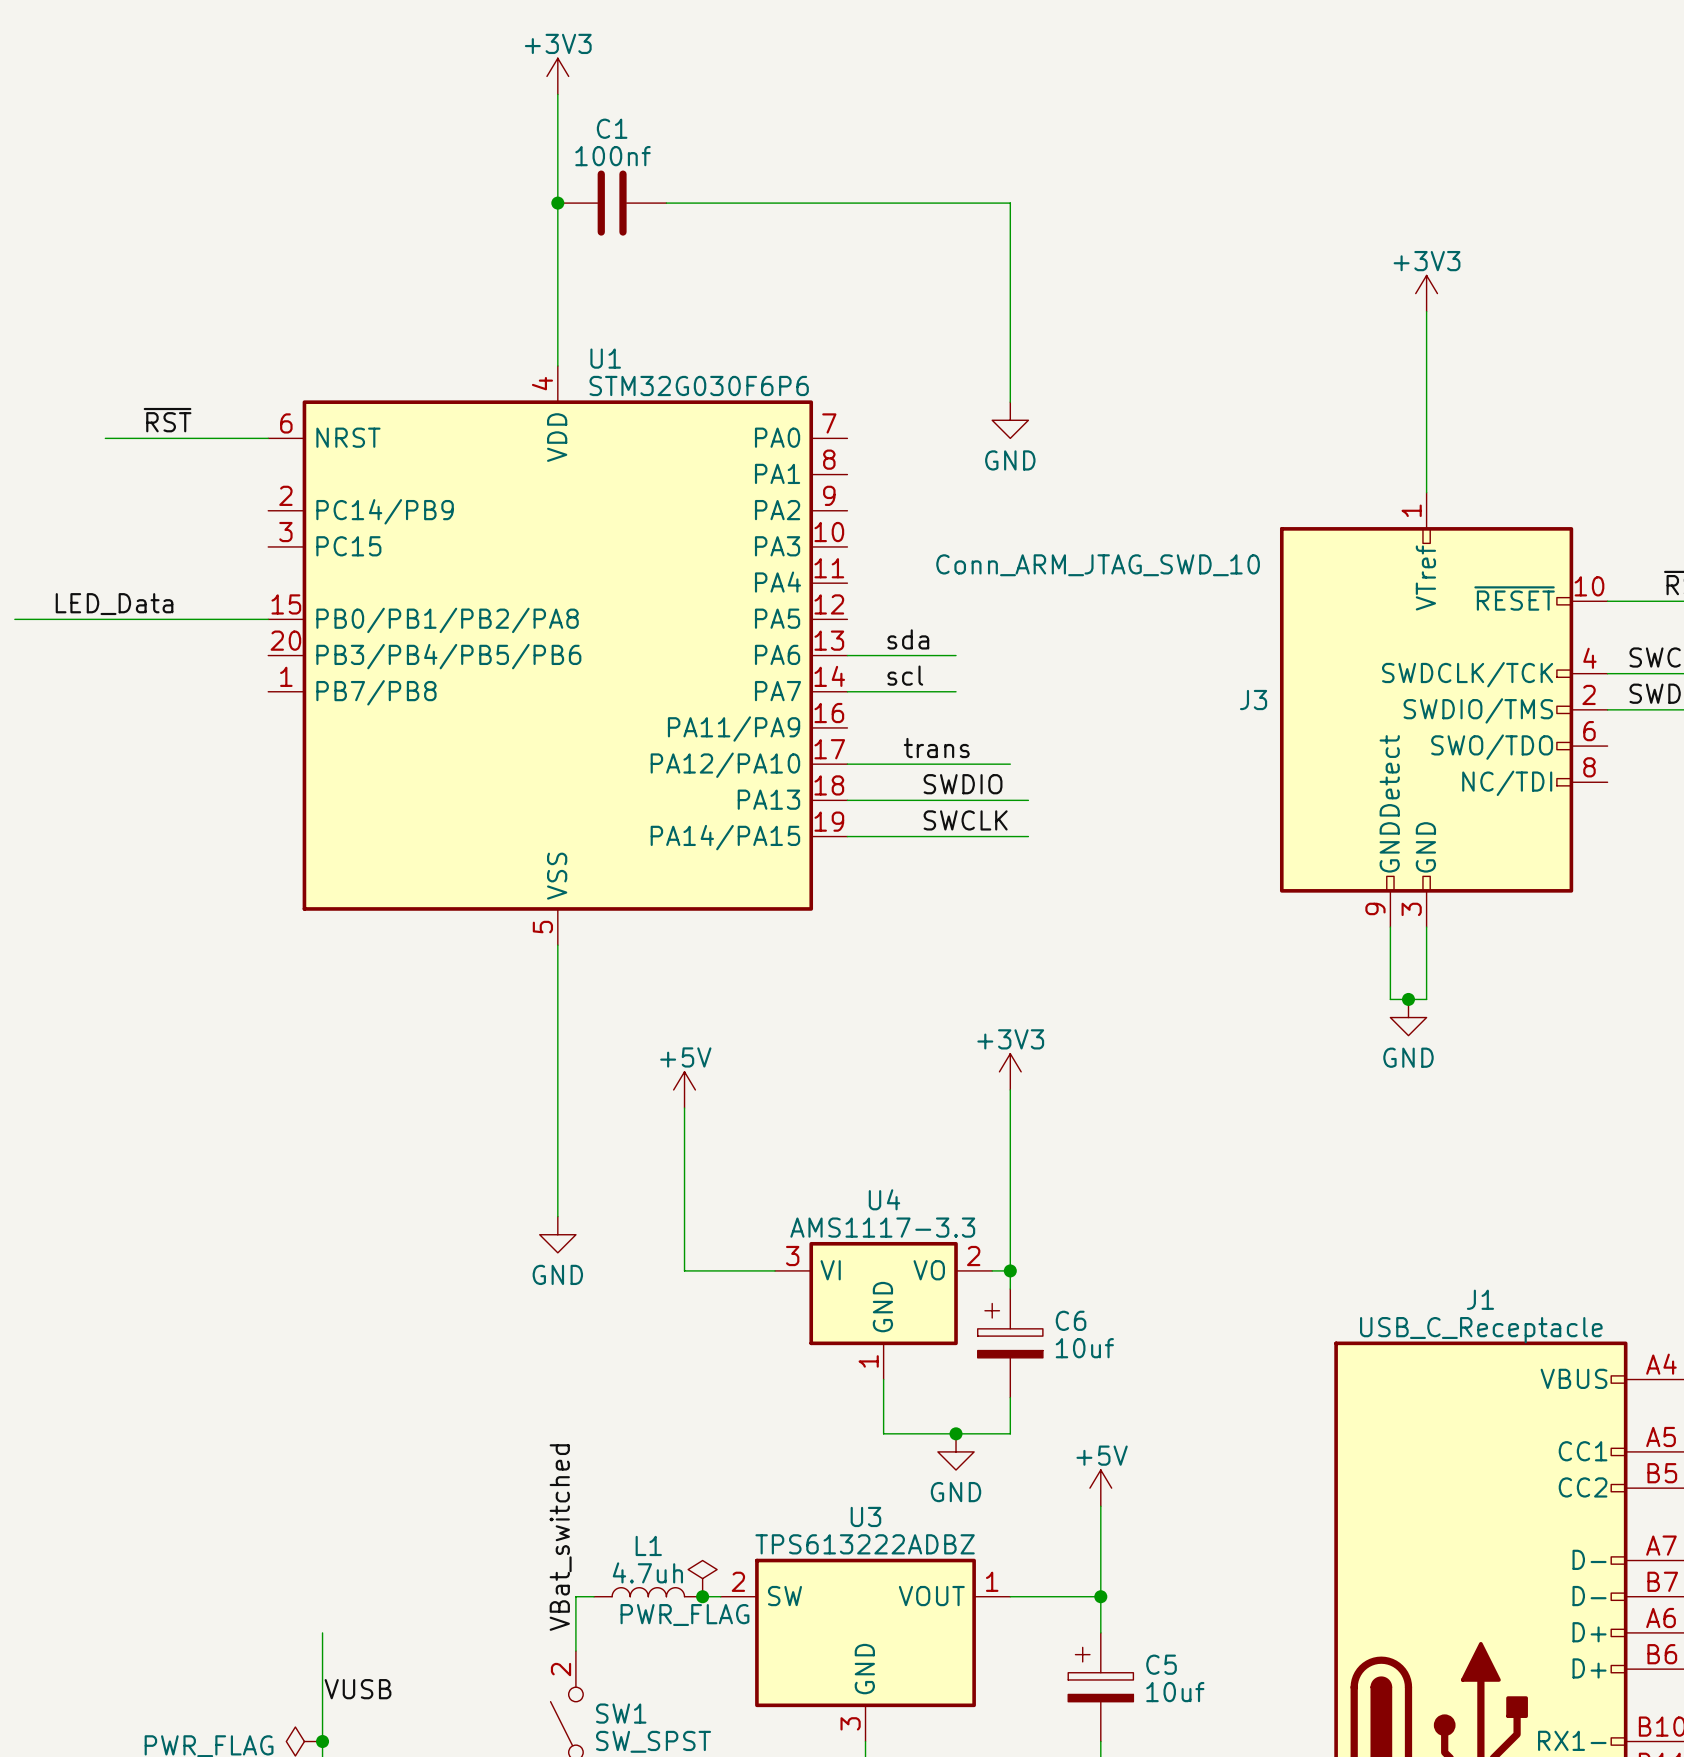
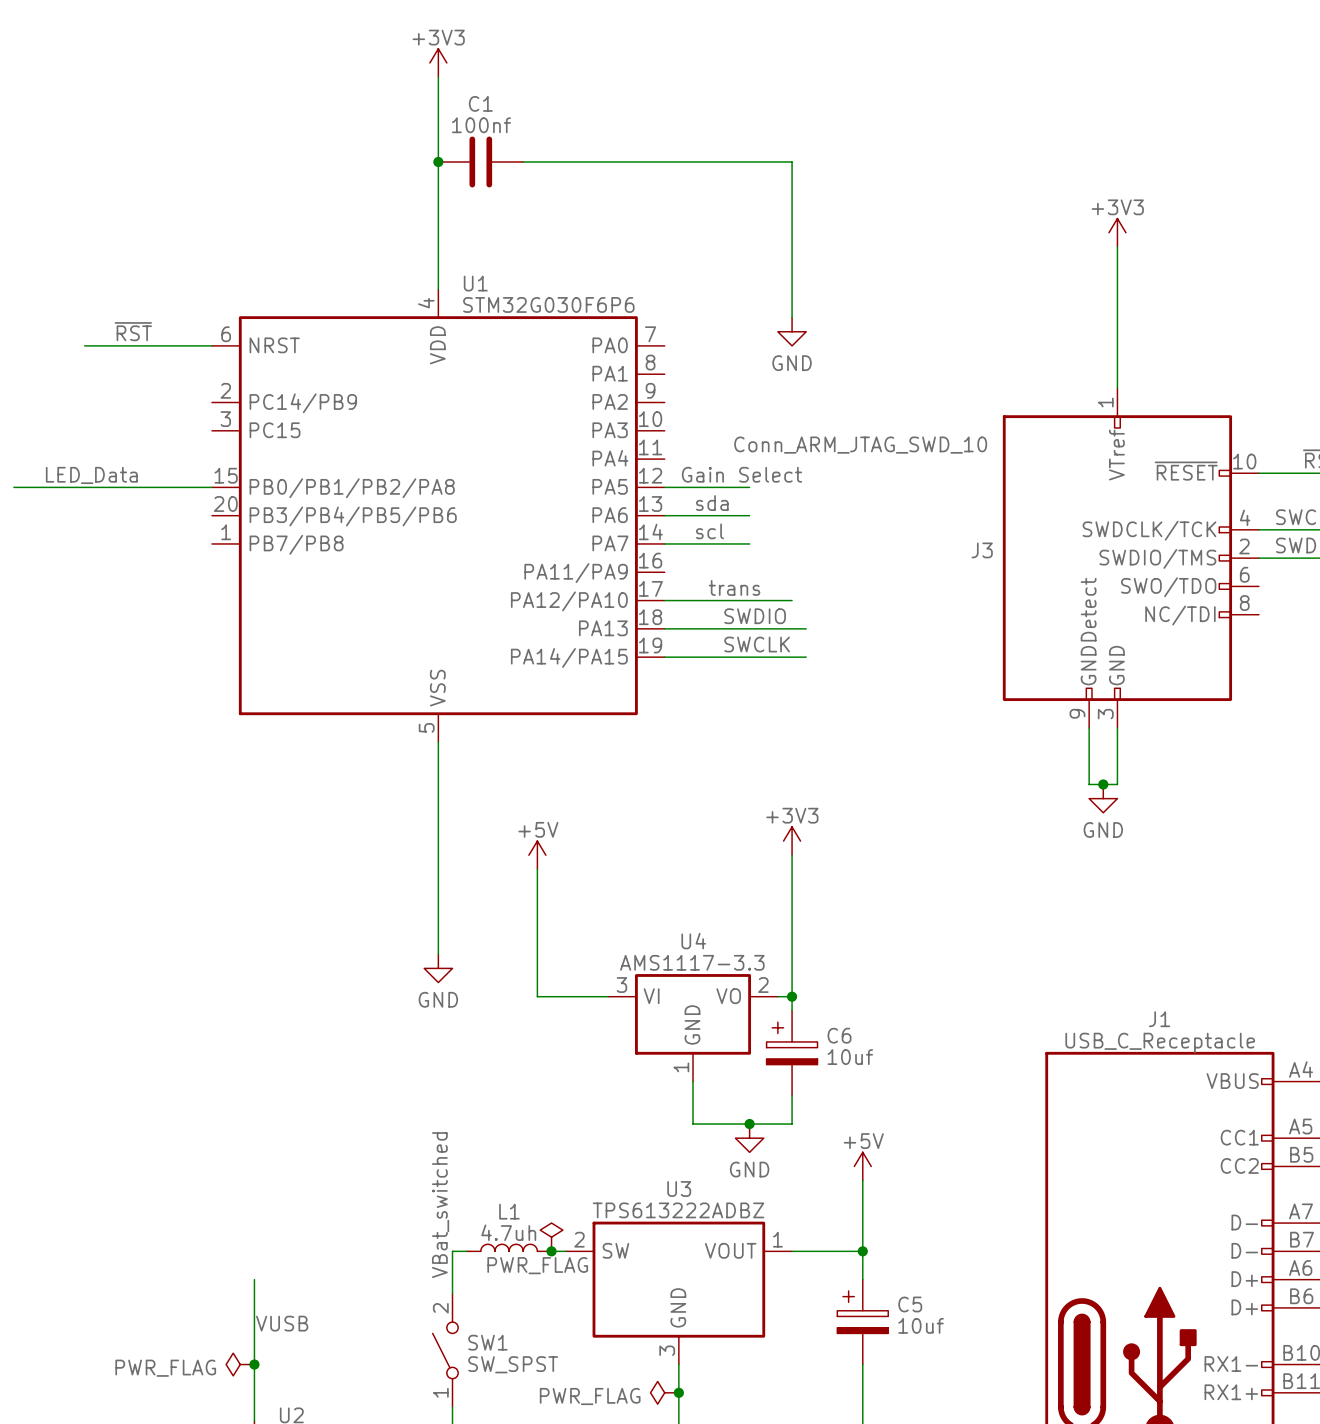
label: none -> Gain Select (741, 474)
wire: none -> (664, 487) (749, 487)

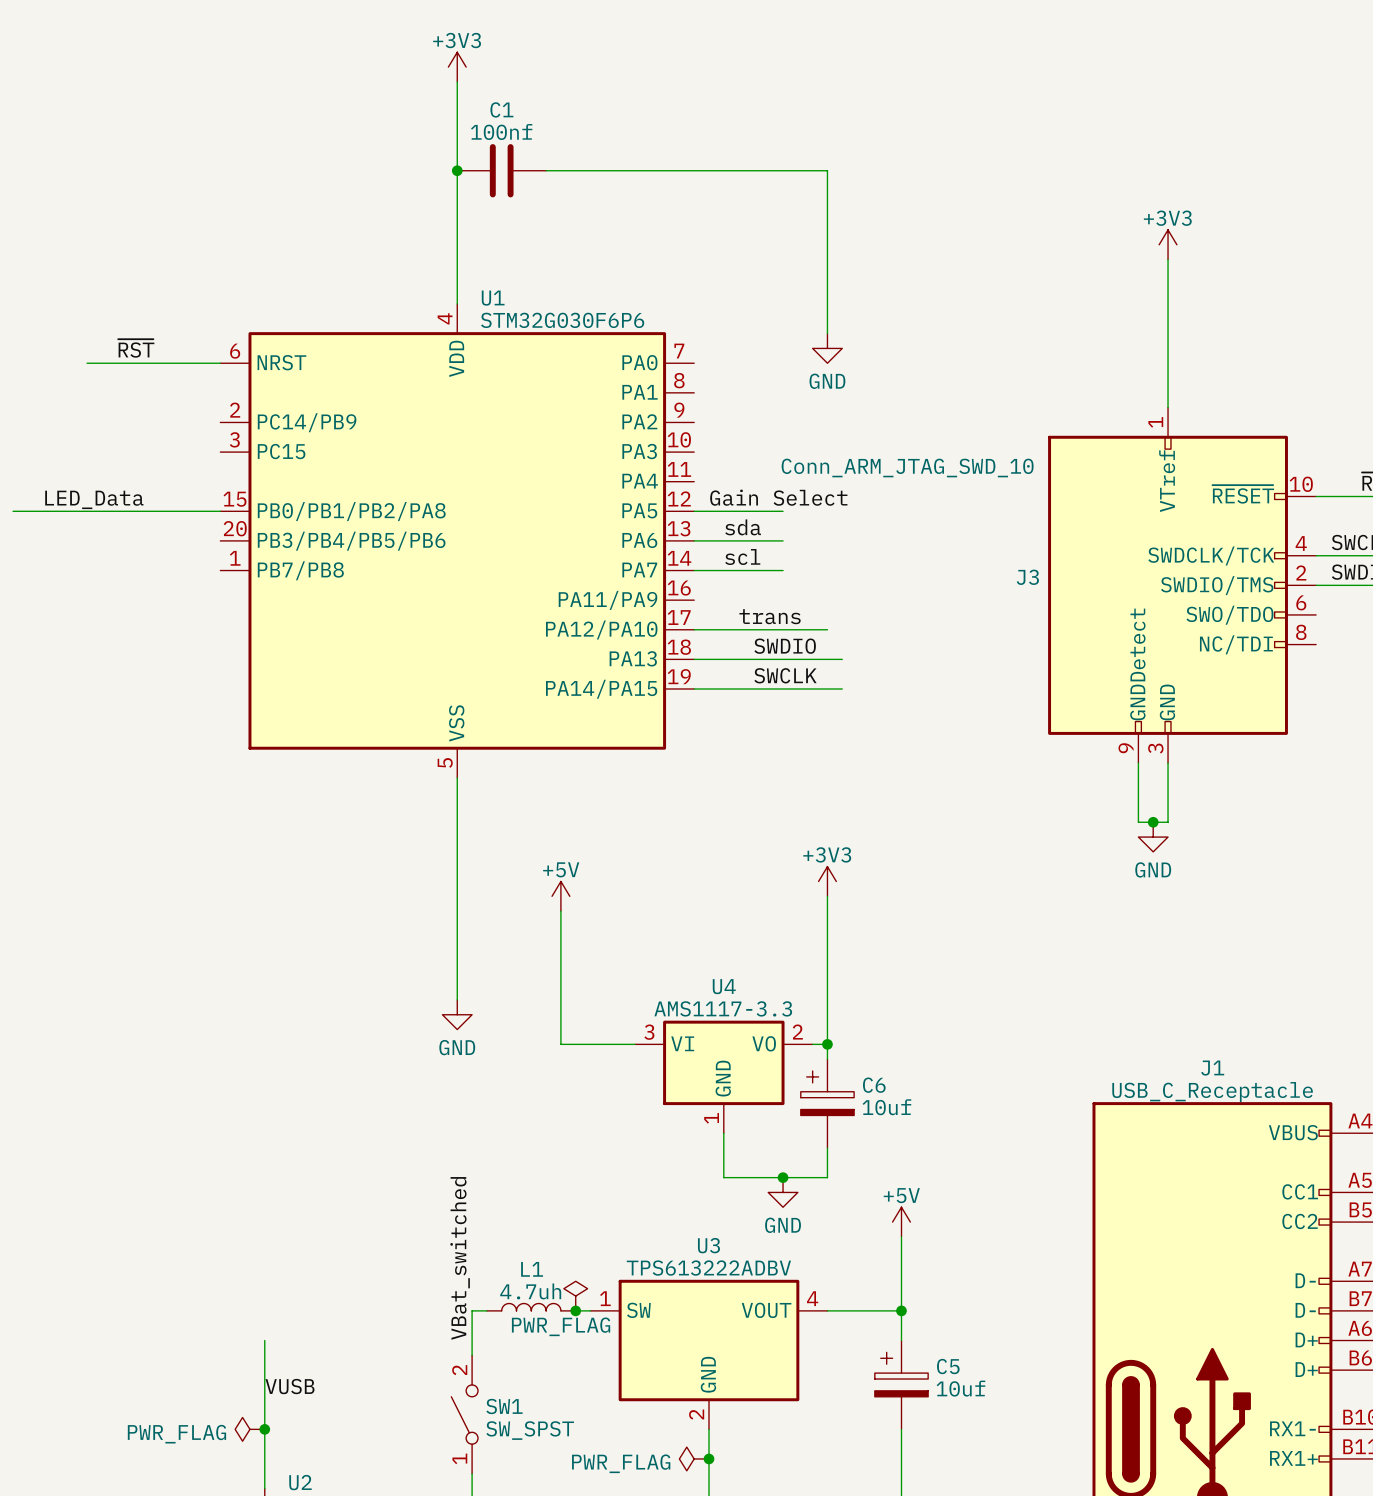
U3 value: TPS613222ADBZ (678, 1210) -> TPS613222ADBV (708, 1268)
U3 pin number: 2 (579, 1239) -> 1 (605, 1298)
U3 pin number: 1 (777, 1239) -> 4 (812, 1298)
U3 pin number: 3 (667, 1350) -> 2 (696, 1414)

